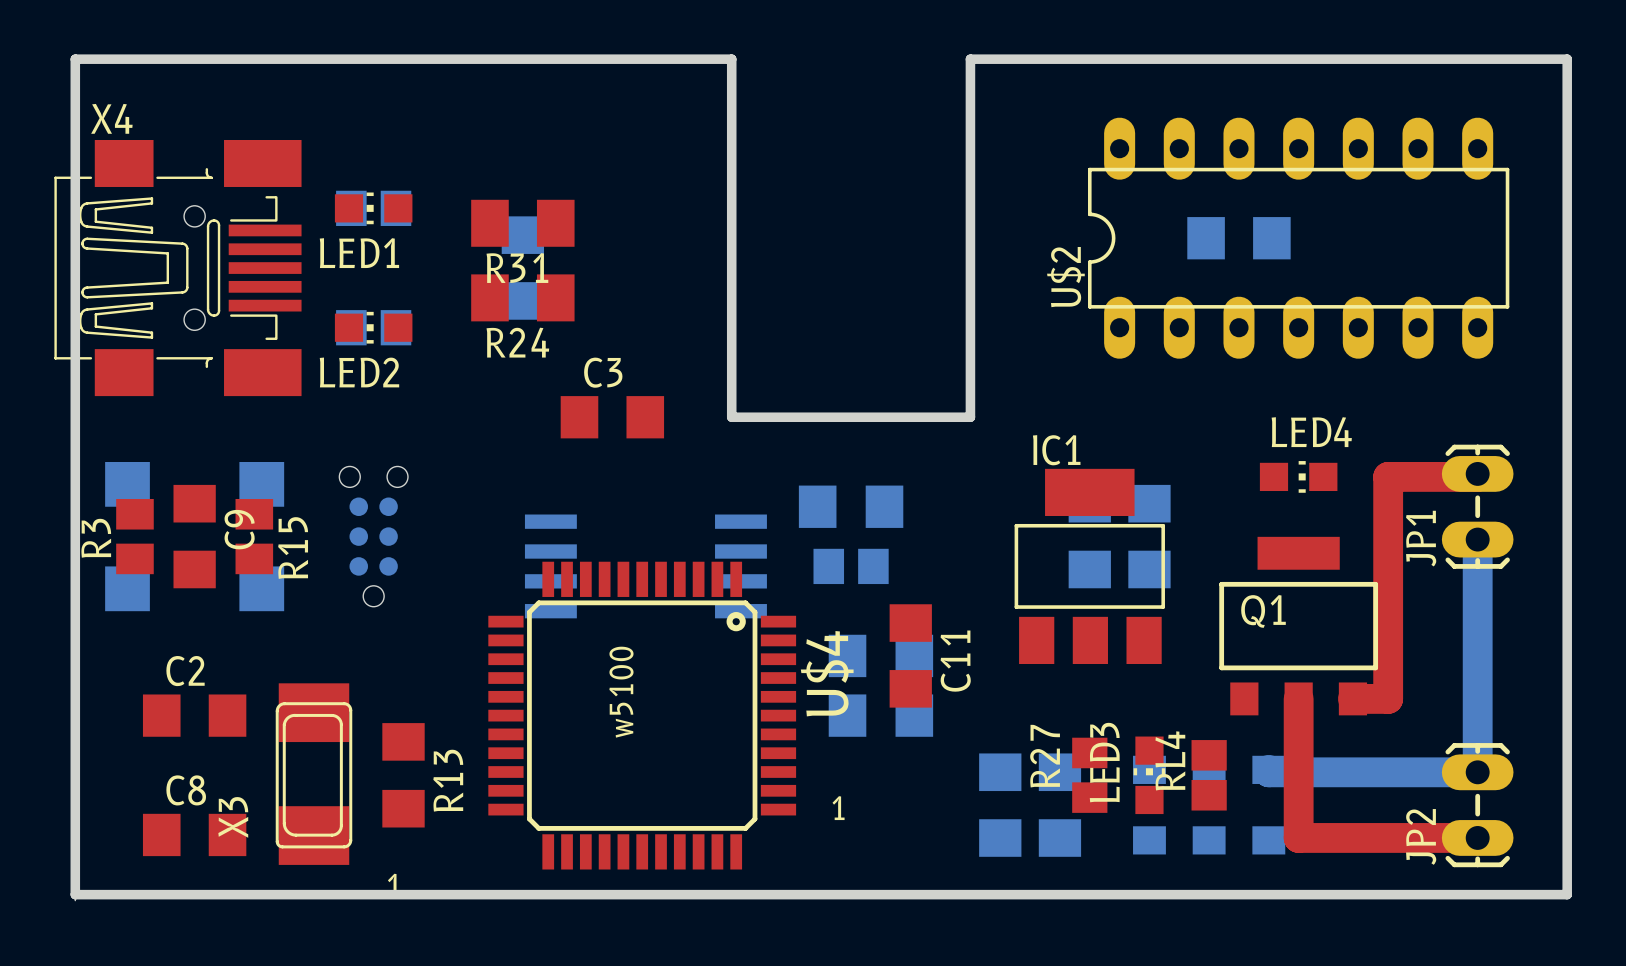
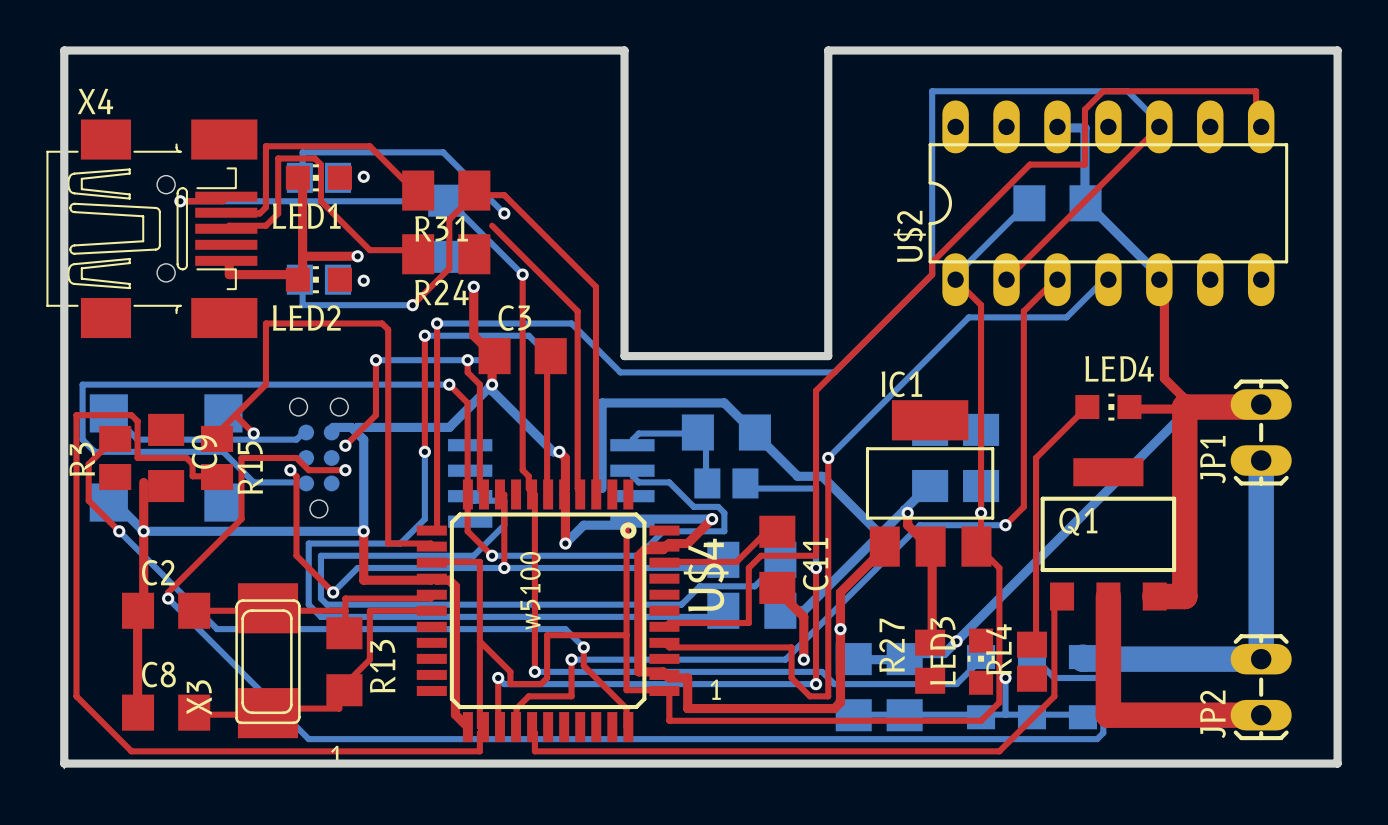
bottom track: none -> (1057, 126) (1084, 127) (1085, 203) (1158, 274) (1159, 279)
bottom track: none -> (1159, 126) (1158, 121) (1127, 91) (932, 91) (932, 274) (834, 372) (620, 372) (571, 323) (437, 323)
top track: none -> (1159, 126) (1006, 279)
top track: none -> (1261, 126) (1256, 121) (1256, 91) (1103, 91) (1084, 109) (1084, 164) (1029, 164) (932, 262) (932, 274) (816, 390) (816, 555) (761, 555) (748, 567) (748, 622) (669, 622) (664, 626)
via: none -> (363, 176)
top track: none -> (297, 177) (302, 182) (302, 274) (297, 279) (296, 274) (229, 274) (229, 262) (226, 260)
bottom track: none -> (299, 177) (302, 176) (302, 152) (443, 152) (504, 213)
top track: none -> (418, 190) (412, 189) (369, 146) (265, 146) (265, 207) (259, 213) (226, 212)
top track: none -> (226, 196) (223, 201) (180, 201)
bottom track: none -> (180, 201) (449, 201) (522, 274)
via: none -> (180, 201)
bottom track: none -> (1029, 203) (956, 274) (955, 279)
via: none -> (504, 213)
top track: none -> (492, 225) (577, 311) (577, 488) (580, 494)
top track: none -> (226, 228) (229, 225) (265, 225) (278, 213) (278, 158) (314, 158) (320, 164) (320, 201) (369, 250) (412, 250) (418, 254)
top track: none -> (302, 256) (357, 256)
via: none -> (357, 256)
top track: none -> (522, 274) (522, 470) (528, 476) (528, 488) (532, 494) (534, 494) (534, 671)
via: none -> (522, 274)
bottom track: none -> (299, 279) (302, 280) (302, 305) (412, 305)
top track: none -> (955, 279) (981, 305) (981, 543) (976, 546) (999, 567) (999, 702) (981, 720) (669, 720) (669, 690) (626, 690) (626, 525)
top track: none -> (1057, 279) (1023, 311) (1023, 506) (1005, 525)
bottom track: none -> (1108, 279) (1103, 280) (1066, 317) (968, 317) (828, 457)
top track: none -> (1159, 279) (1164, 280) (1164, 378) (1182, 396) (1184, 407)
via: none -> (363, 280)
top track: none -> (473, 286) (473, 335) (494, 356) (492, 360) (492, 384)
via: none -> (473, 286)
top track: none -> (412, 305) (449, 268) (449, 219) (473, 195) (474, 190) (479, 195) (504, 195) (596, 286) (596, 494)
via: none -> (412, 305)
top track: none -> (437, 323) (437, 531) (431, 530)
via: none -> (437, 323)
bottom track: none -> (424, 335) (528, 335) (547, 354) (552, 356)
top track: none -> (424, 335) (424, 451)
via: none -> (424, 335)
bottom track: none -> (492, 356) (492, 360) (375, 360)
top track: none -> (550, 356) (547, 360) (548, 494)
top track: none -> (375, 360) (375, 415) (345, 445)
via: none -> (375, 360)
top track: none -> (467, 360) (467, 372) (479, 384) (479, 488) (483, 494)
via: none -> (467, 360)
bottom track: none -> (449, 384) (82, 384) (82, 439) (94, 451) (223, 451) (253, 482) (306, 483)
top track: none -> (449, 384) (467, 402) (467, 494)
via: none -> (449, 384)
bottom track: none -> (492, 384) (449, 427) (357, 427) (354, 430)
via: none -> (492, 384)
bottom track: none -> (489, 387) (553, 451) (559, 451)
top track: none -> (1087, 407) (1036, 457) (1036, 641) (1031, 644)
top track: none -> (1129, 407) (1133, 409) (1184, 409)
bottom track: none -> (1188, 409) (944, 653) (907, 653) (904, 659) (901, 659) (840, 659) (840, 629)
bottom track: none -> (108, 413) (113, 415) (137, 439) (296, 439) (306, 432)
top track: none -> (235, 415) (253, 433)
bottom track: none -> (331, 432) (333, 427) (351, 427) (363, 439) (363, 531) (143, 531) (119, 506) (113, 506) (108, 502)
via: none -> (253, 433)
top track: none -> (115, 438) (88, 464) (88, 500) (119, 531)
top track: none -> (217, 438) (217, 433) (265, 384) (265, 323) (382, 323) (388, 329) (388, 543) (430, 543) (431, 546)
bottom track: none -> (632, 445) (632, 439) (638, 433) (706, 433) (707, 483)
via: none -> (345, 445)
bottom track: none -> (424, 451) (424, 519) (400, 543) (308, 543) (308, 604) (320, 616) (712, 616) (718, 610) (723, 610)
via: none -> (424, 451)
top track: none -> (559, 451) (565, 457) (565, 543)
via: none -> (559, 451)
top track: none -> (828, 457) (828, 696) (809, 696) (791, 678) (791, 647) (669, 647) (664, 642)
via: none -> (828, 457)
top track: none -> (290, 470) (296, 476) (296, 555) (333, 592)
via: none -> (290, 470)
top track: none -> (345, 470) (308, 470) (296, 457) (241, 457) (241, 519) (168, 592) (168, 598)
via: none -> (345, 470)
bottom track: none -> (632, 470) (632, 476) (638, 482) (669, 482) (693, 506) (718, 506) (724, 512) (724, 531) (663, 531) (638, 555) (492, 555)
top track: none -> (217, 477) (192, 476) (192, 464) (186, 457) (137, 457) (137, 421) (131, 415) (76, 415) (76, 696) (131, 751) (479, 751) (479, 733) (483, 727) (479, 726) (479, 561) (431, 562)
top track: none -> (143, 482) (143, 610) (137, 610) (138, 712)
bottom track: none -> (745, 483) (748, 488) (816, 488) (816, 567)
bottom track: none -> (930, 486) (803, 610) (780, 610)
bottom track: none -> (602, 488) (602, 402) (724, 402) (797, 476) (822, 476) (880, 534)
top track: none -> (467, 494) (467, 531) (492, 555)
top track: none -> (500, 494) (504, 494) (504, 567)
bottom track: none -> (470, 496) (473, 500) (504, 500) (504, 525) (473, 555) (320, 555) (320, 598) (327, 604) (681, 604) (699, 586) (754, 586) (780, 559)
top track: none -> (907, 512) (907, 525) (932, 549) (932, 641) (930, 642)
via: none -> (907, 512)
via: none -> (981, 512)
bottom track: none -> (712, 519) (632, 519) (632, 521) (626, 525) (583, 525) (565, 543)
top track: none -> (712, 519) (687, 543) (669, 543) (663, 549) (644, 549) (638, 555) (638, 671) (663, 671) (669, 678) (687, 678) (687, 708) (834, 708) (840, 702) (840, 592) (883, 549) (884, 546) (883, 543)
via: none -> (712, 519)
bottom track: none -> (1005, 525) (919, 525) (785, 659) (571, 659)
via: none -> (1005, 525)
bottom track: none -> (119, 531) (217, 629) (565, 629) (583, 647)
via: none -> (119, 531)
via: none -> (143, 531)
top track: none -> (363, 531) (363, 580) (430, 580) (431, 578) (449, 580) (455, 586) (455, 714) (467, 726)
via: none -> (363, 531)
top track: none -> (777, 531) (773, 537) (761, 537) (736, 561) (664, 562)
via: none -> (565, 543)
via: none -> (492, 555)
bottom track: none -> (723, 559) (712, 567) (357, 567) (333, 592)
via: none -> (504, 567)
top track: none -> (816, 567) (816, 684)
via: none -> (816, 567)
top track: none -> (777, 587) (779, 592) (803, 616) (803, 659)
via: none -> (333, 592)
top track: none -> (431, 594) (430, 598) (345, 598) (344, 633)
top track: none -> (1062, 596) (1054, 604) (1054, 696) (999, 751) (534, 751) (534, 733) (532, 727)
bottom track: none -> (168, 598) (308, 739) (1097, 739) (1103, 733) (1103, 678) (1054, 678) (1031, 657)
via: none -> (168, 598)
top track: none -> (194, 610) (265, 610) (267, 608) (272, 610) (345, 610)
top track: none -> (431, 610) (369, 610) (369, 659) (345, 684) (344, 690) (339, 690) (339, 708) (272, 708) (265, 714) (198, 714) (194, 712)
via: none -> (840, 629)
top track: none -> (626, 635) (547, 635) (547, 678) (540, 684) (510, 684) (510, 671) (479, 641)
via: none -> (956, 641)
top track: none -> (583, 647) (583, 665) (626, 708) (626, 726) (628, 727)
via: none -> (583, 647)
bottom track: none -> (981, 657) (981, 659) (956, 684) (834, 684) (822, 671) (534, 671)
top track: none -> (571, 659) (571, 696) (528, 696) (516, 708) (516, 727)
via: none -> (571, 659)
via: none -> (803, 659)
via: none -> (534, 671)
bottom track: none -> (498, 678) (504, 684) (816, 684)
top track: none -> (498, 678) (498, 726) (500, 727)
via: none -> (498, 678)
bottom track: none -> (1005, 678) (1005, 714)
via: none -> (1005, 678)
via: none -> (816, 684)
bottom track: none -> (853, 715) (1029, 714) (1031, 717) (1036, 714) (1078, 714) (1082, 717)

